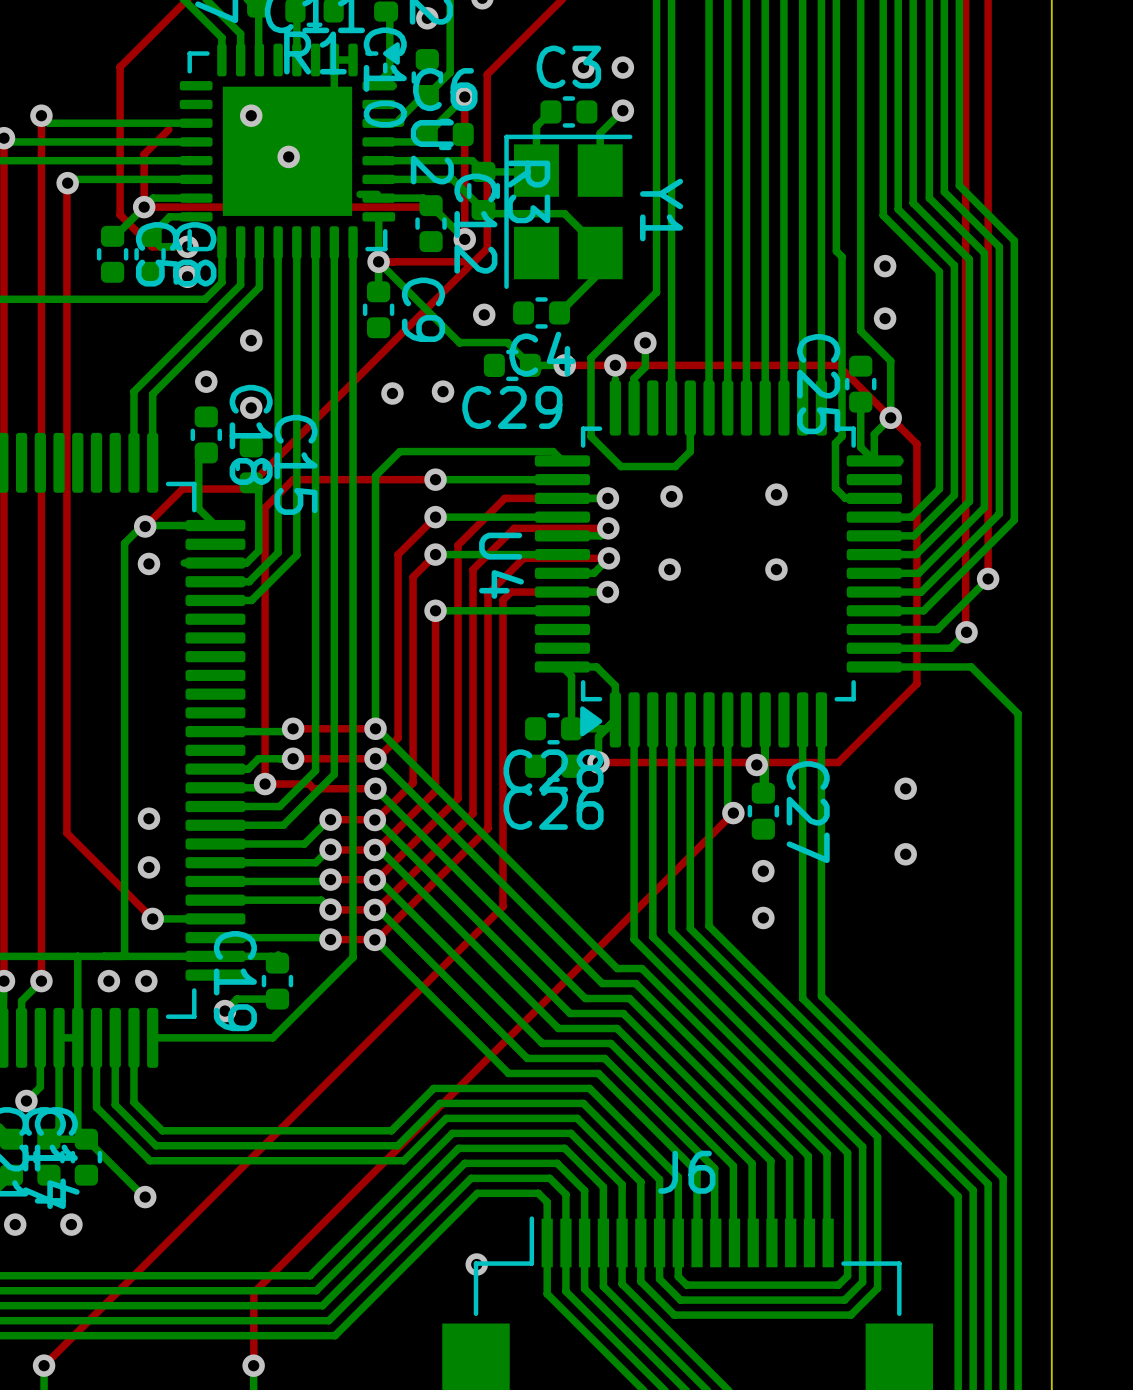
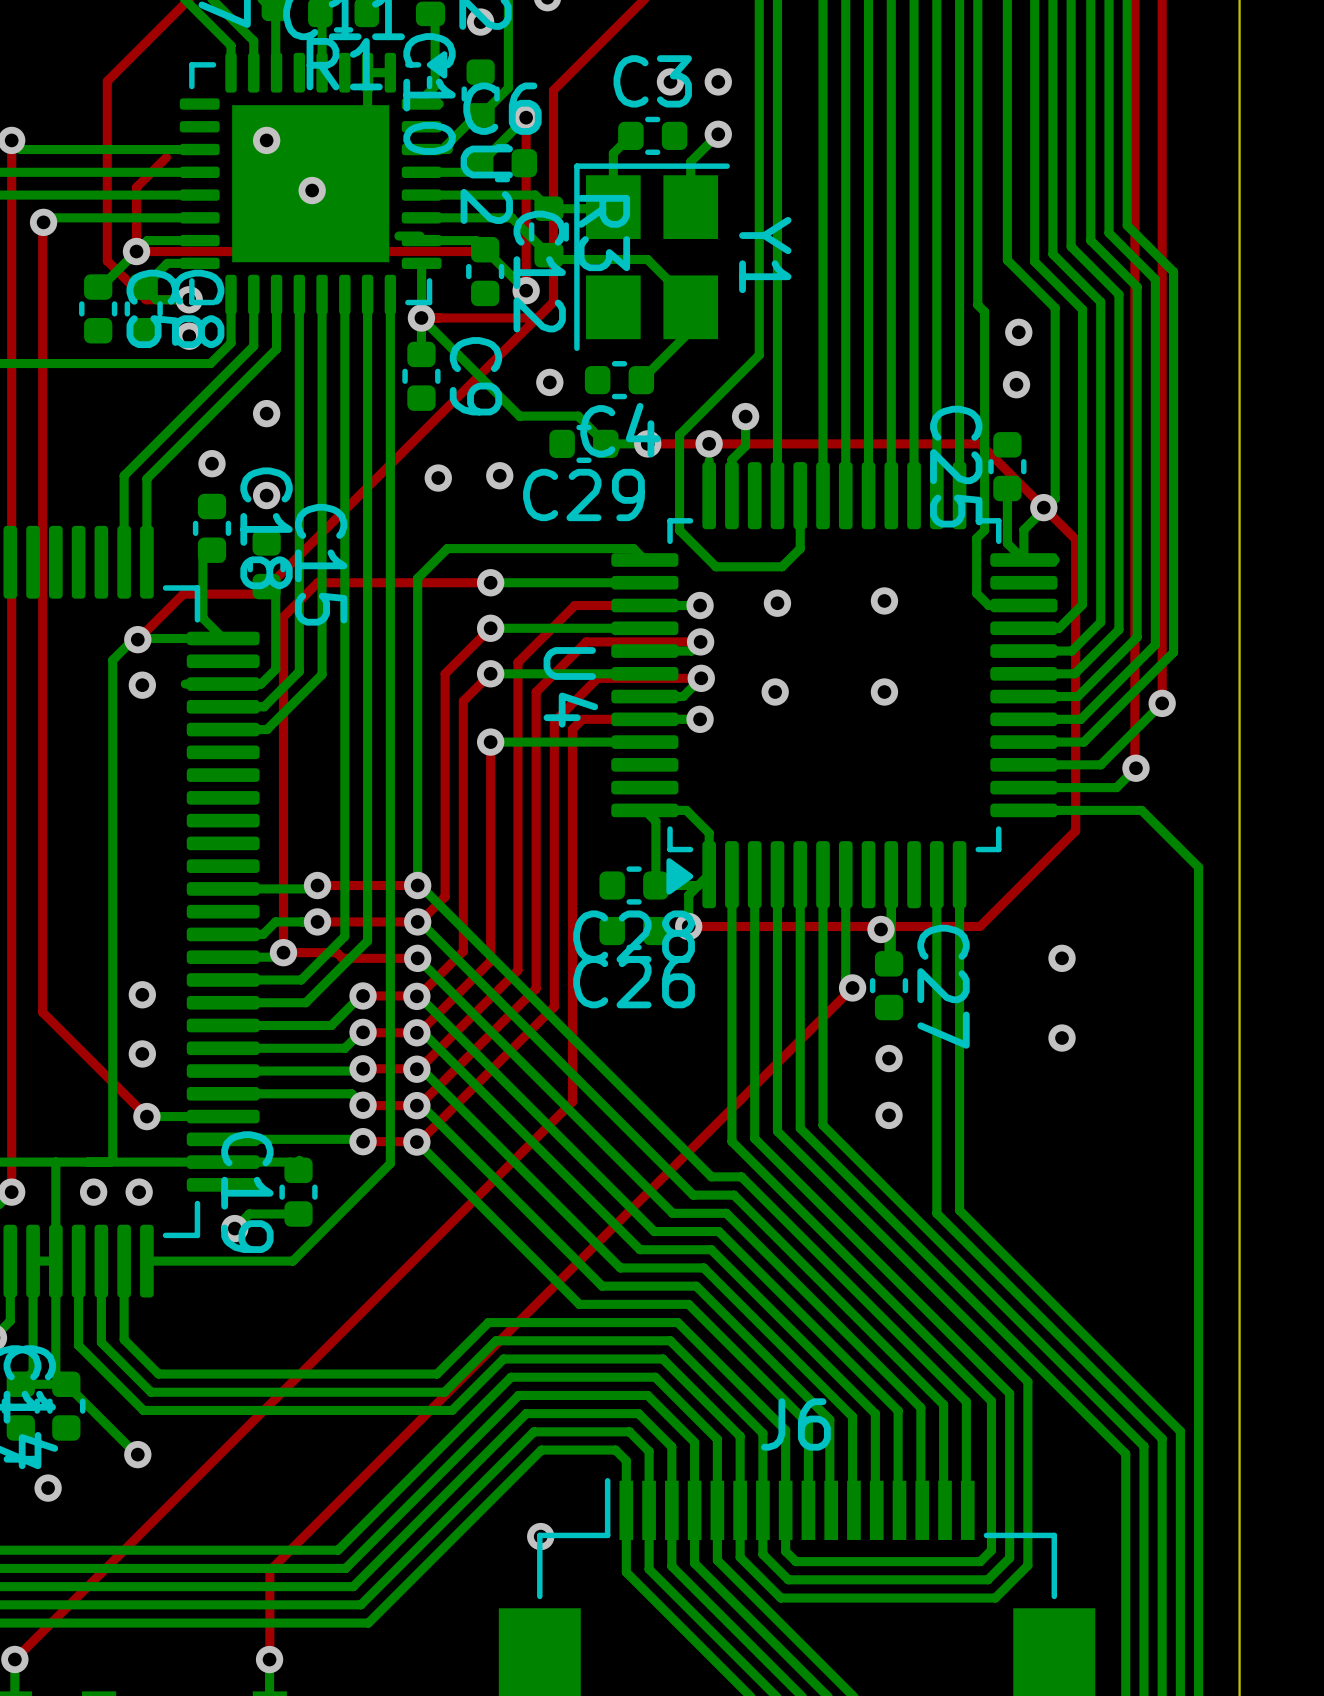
bottom track: (860, 214) (860, 331) (890, 361) (890, 417) (874, 436) -> (1007, 260) (1055, 308) (1055, 498) (1023, 529)
bottom track: (997, 223) (1014, 240) (1014, 520) (997, 536) -> (1173, 271) (1173, 652)
bottom track: (982, 230) (999, 246) (999, 513) (982, 530) -> (1155, 279) (1155, 644)
bottom track: (967, 236) (984, 253) (984, 507) (967, 524) -> (1137, 286) (1137, 637)
bottom track: (952, 242) (969, 259) (969, 501) (952, 518) -> (1118, 294) (1118, 629)
bottom track: (937, 248) (954, 265) (954, 495) (937, 512) -> (1100, 302) (1100, 622)
bottom track: (922, 254) (939, 271) (939, 489) (911, 517) (903, 517) -> (1082, 309) (1082, 604) (1058, 628)
via position: (885, 266) -> (1018, 332)
via position: (885, 318) -> (1016, 384)
via position: (776, 494) -> (884, 600)
via position: (776, 569) -> (884, 692)

